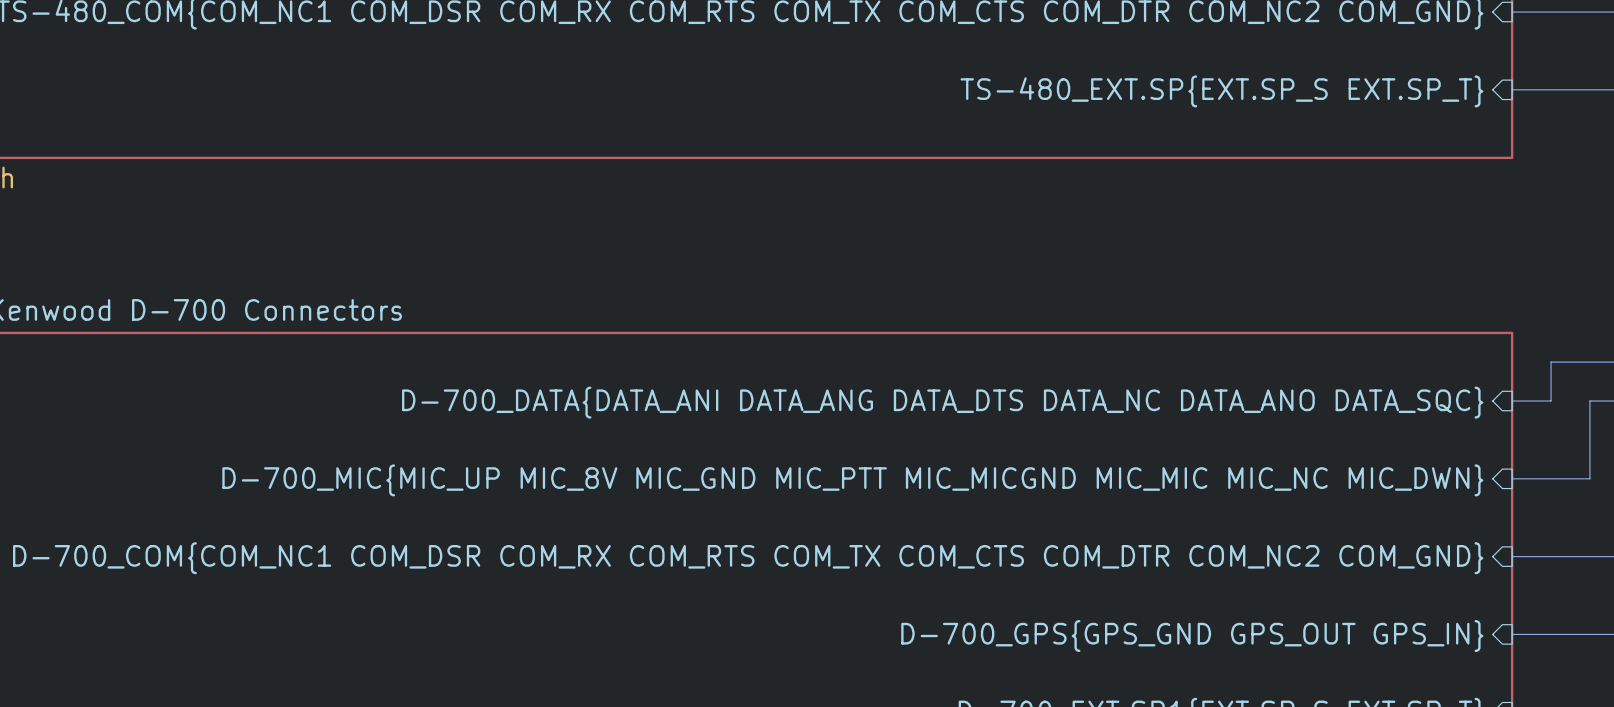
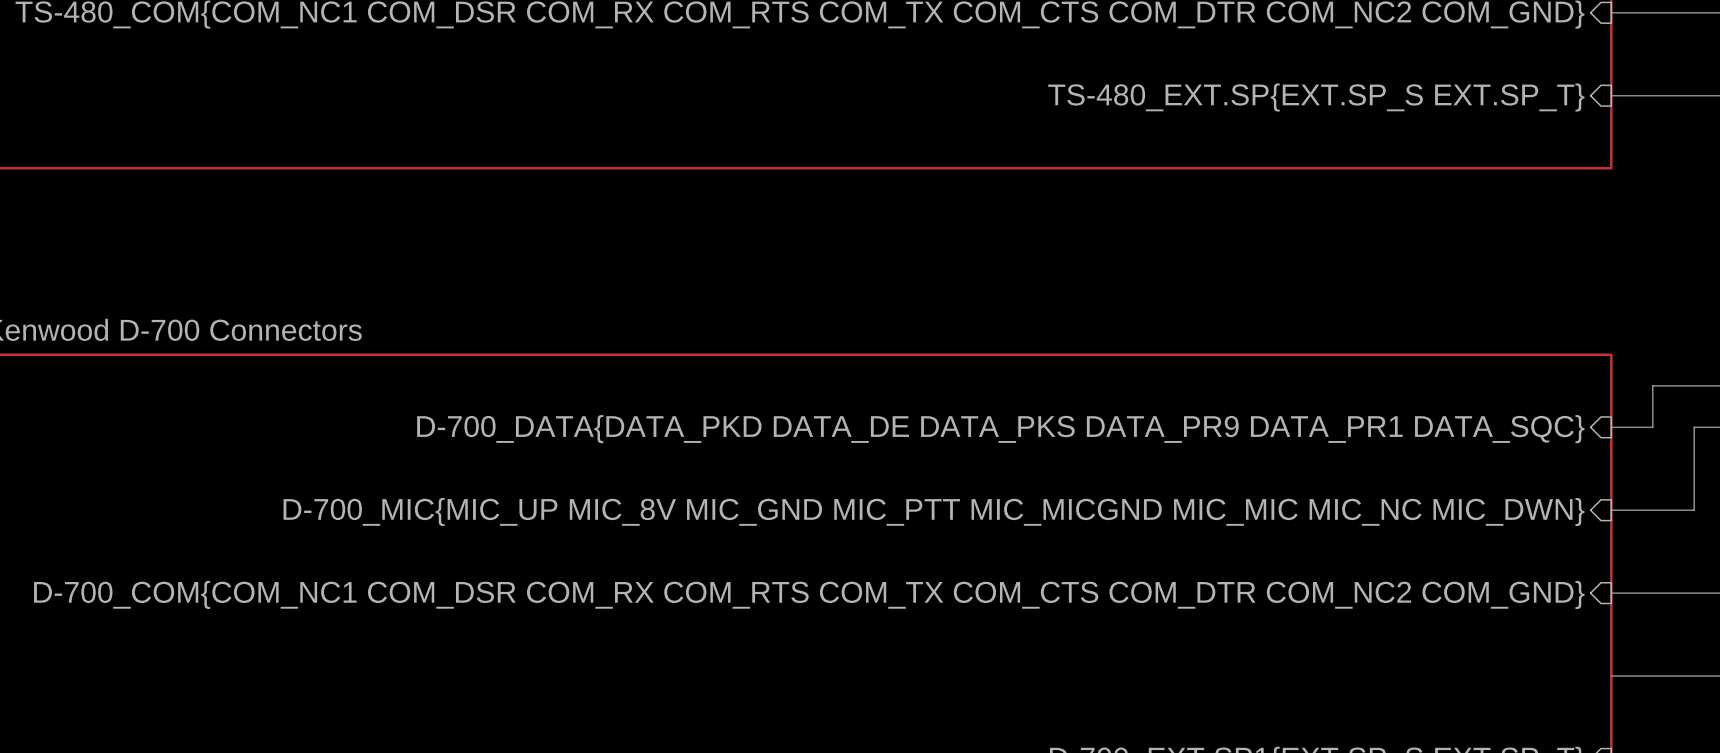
sheet pin: D-700_DATA{DATA_ANI DATA_ANG DATA_DTS DATA_NC DATA_ANO DATA_SQC} (942, 402) -> D-700_DATA{DATA_PKD DATA_DE DATA_PKS DATA_PR9 DATA_PR1 DATA_SQC} (1000, 429)
sheet pin: D-700_GPS{GPS_GND GPS_OUT GPS_IN} (1192, 636) -> none

